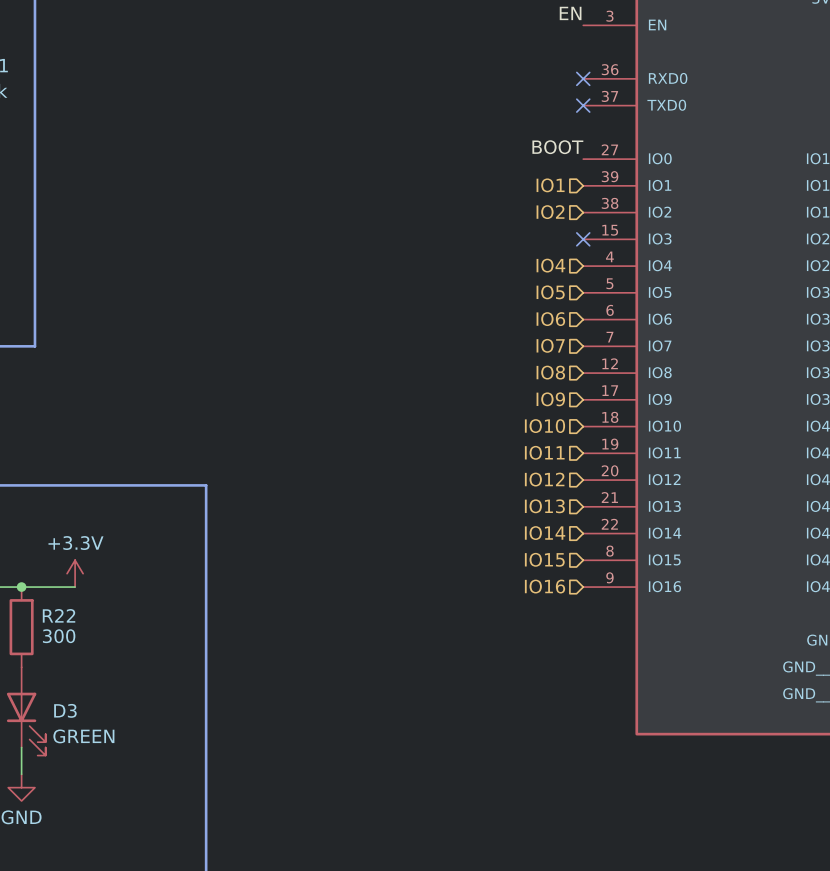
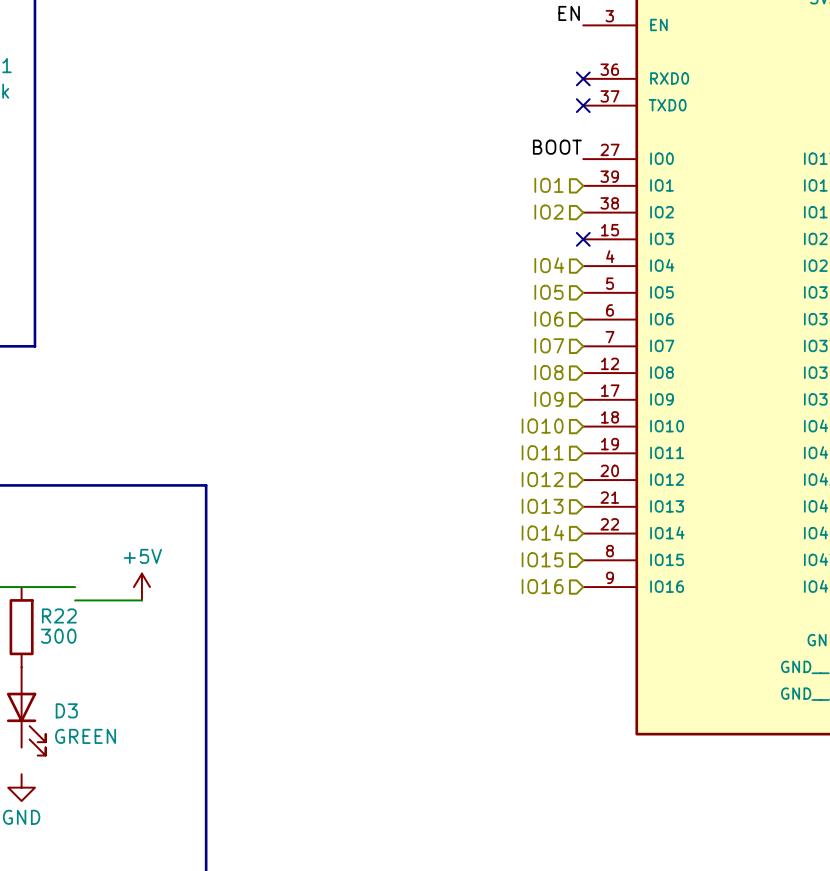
power symbol: +3.3V (75, 573) -> none
junction: (21, 587) -> none
power symbol: none -> +5V (141, 587)
wire: none -> (75, 600) (141, 600)
wire: (21, 747) (21, 774) -> none

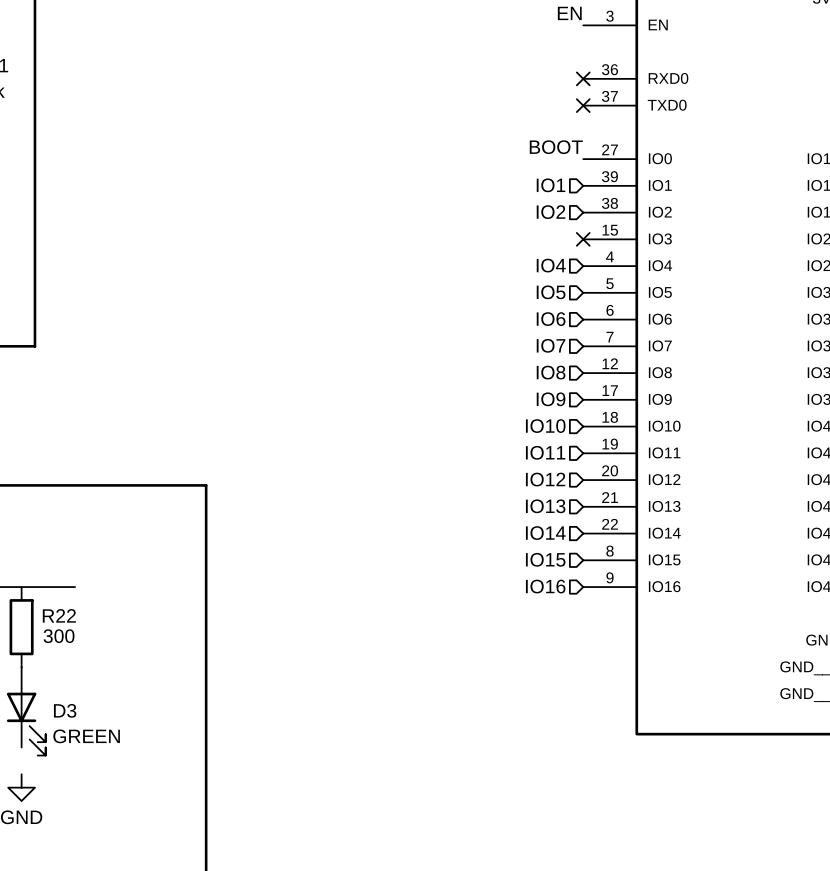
power symbol: +5V (141, 587) -> none
wire: (75, 600) (141, 600) -> none

